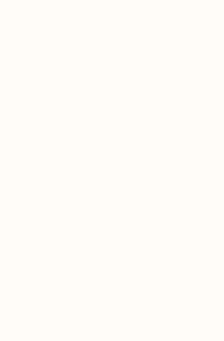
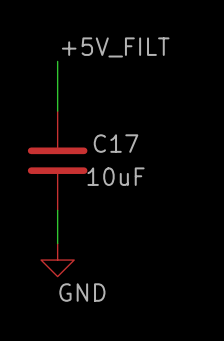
label: none -> +5V_FILT (115, 47)
wire: none -> (57, 61) (57, 111)
C17: none -> 10uF (57, 160)
wire: none -> (57, 210) (57, 243)
power symbol: none -> GND (57, 260)

